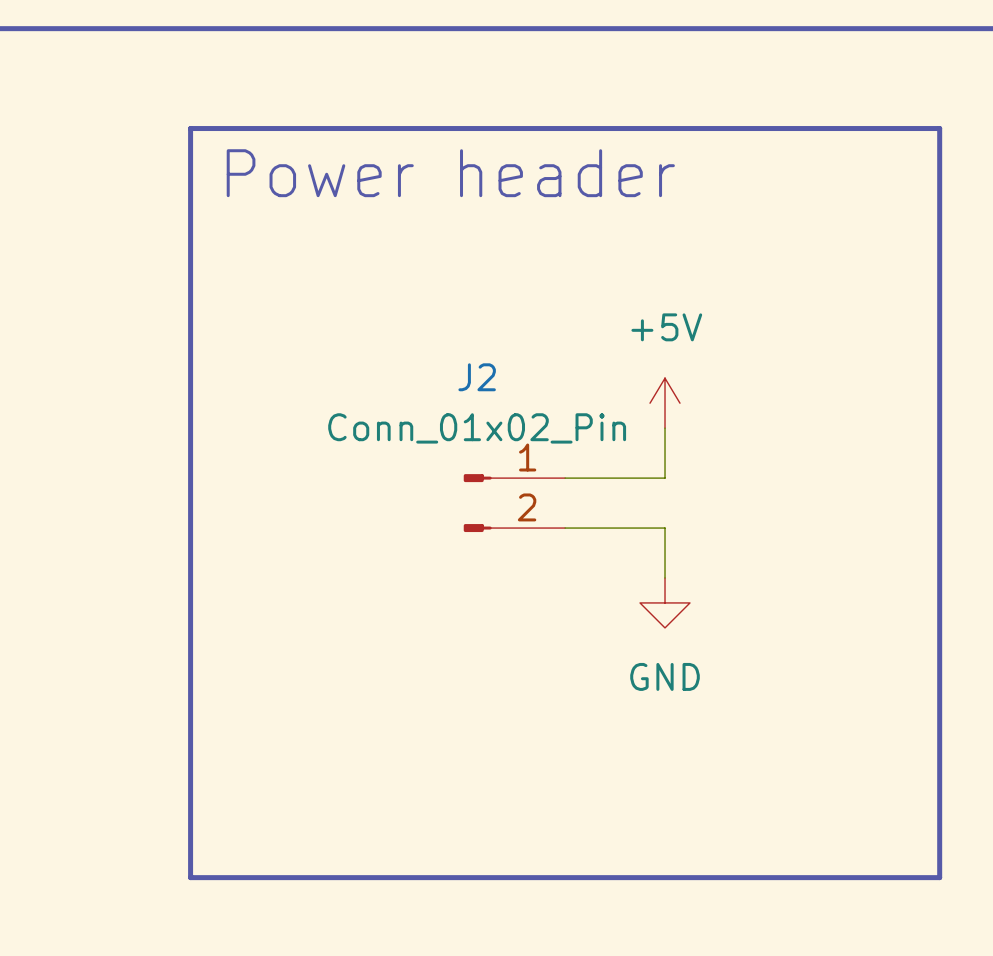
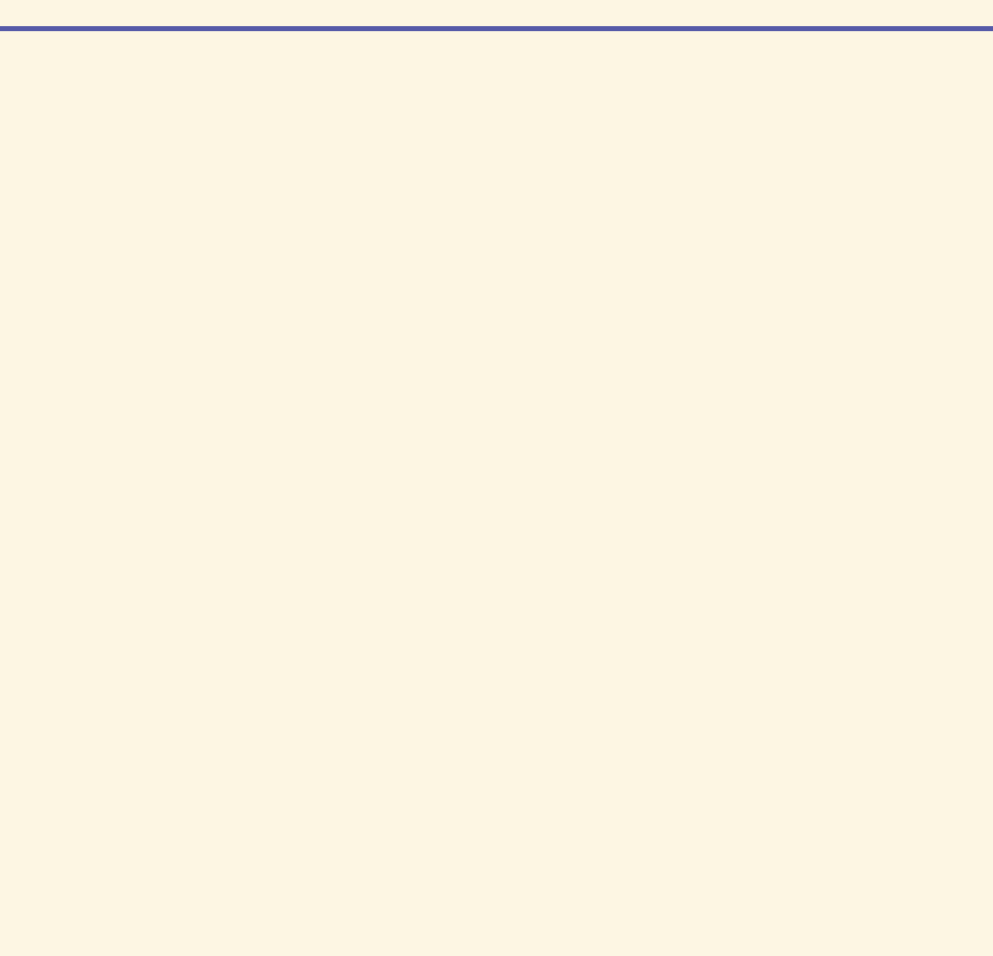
line: (190, 128) (939, 128) (939, 877) (190, 877) (190, 128) -> none
text: Power header (450, 173) -> none
power symbol: +5V (665, 403) -> none
wire: (665, 428) (665, 478) (565, 478) -> none
J2: Conn_01x02_Pin (514, 503) -> none
wire: (565, 528) (665, 528) (665, 577) -> none
power symbol: GND (665, 602) -> none

